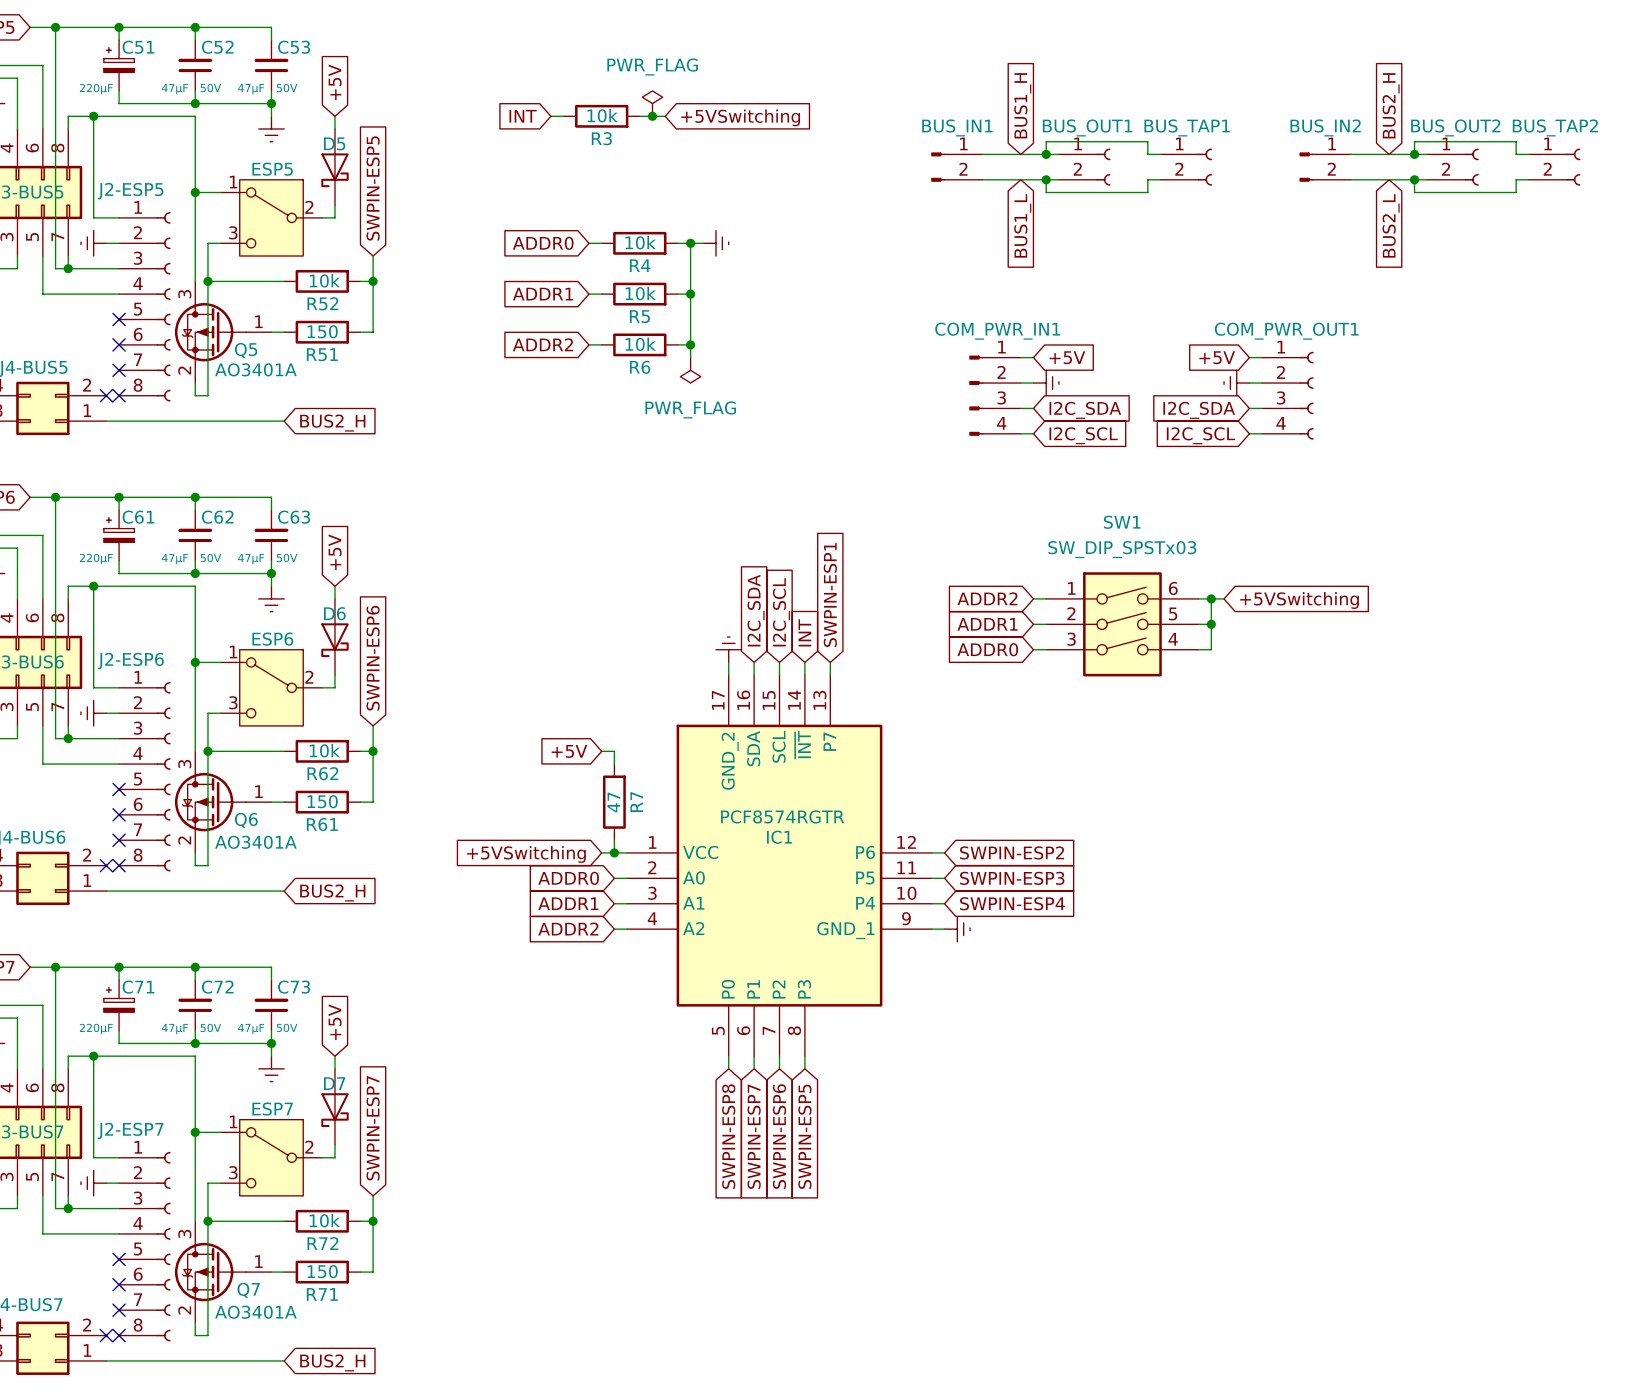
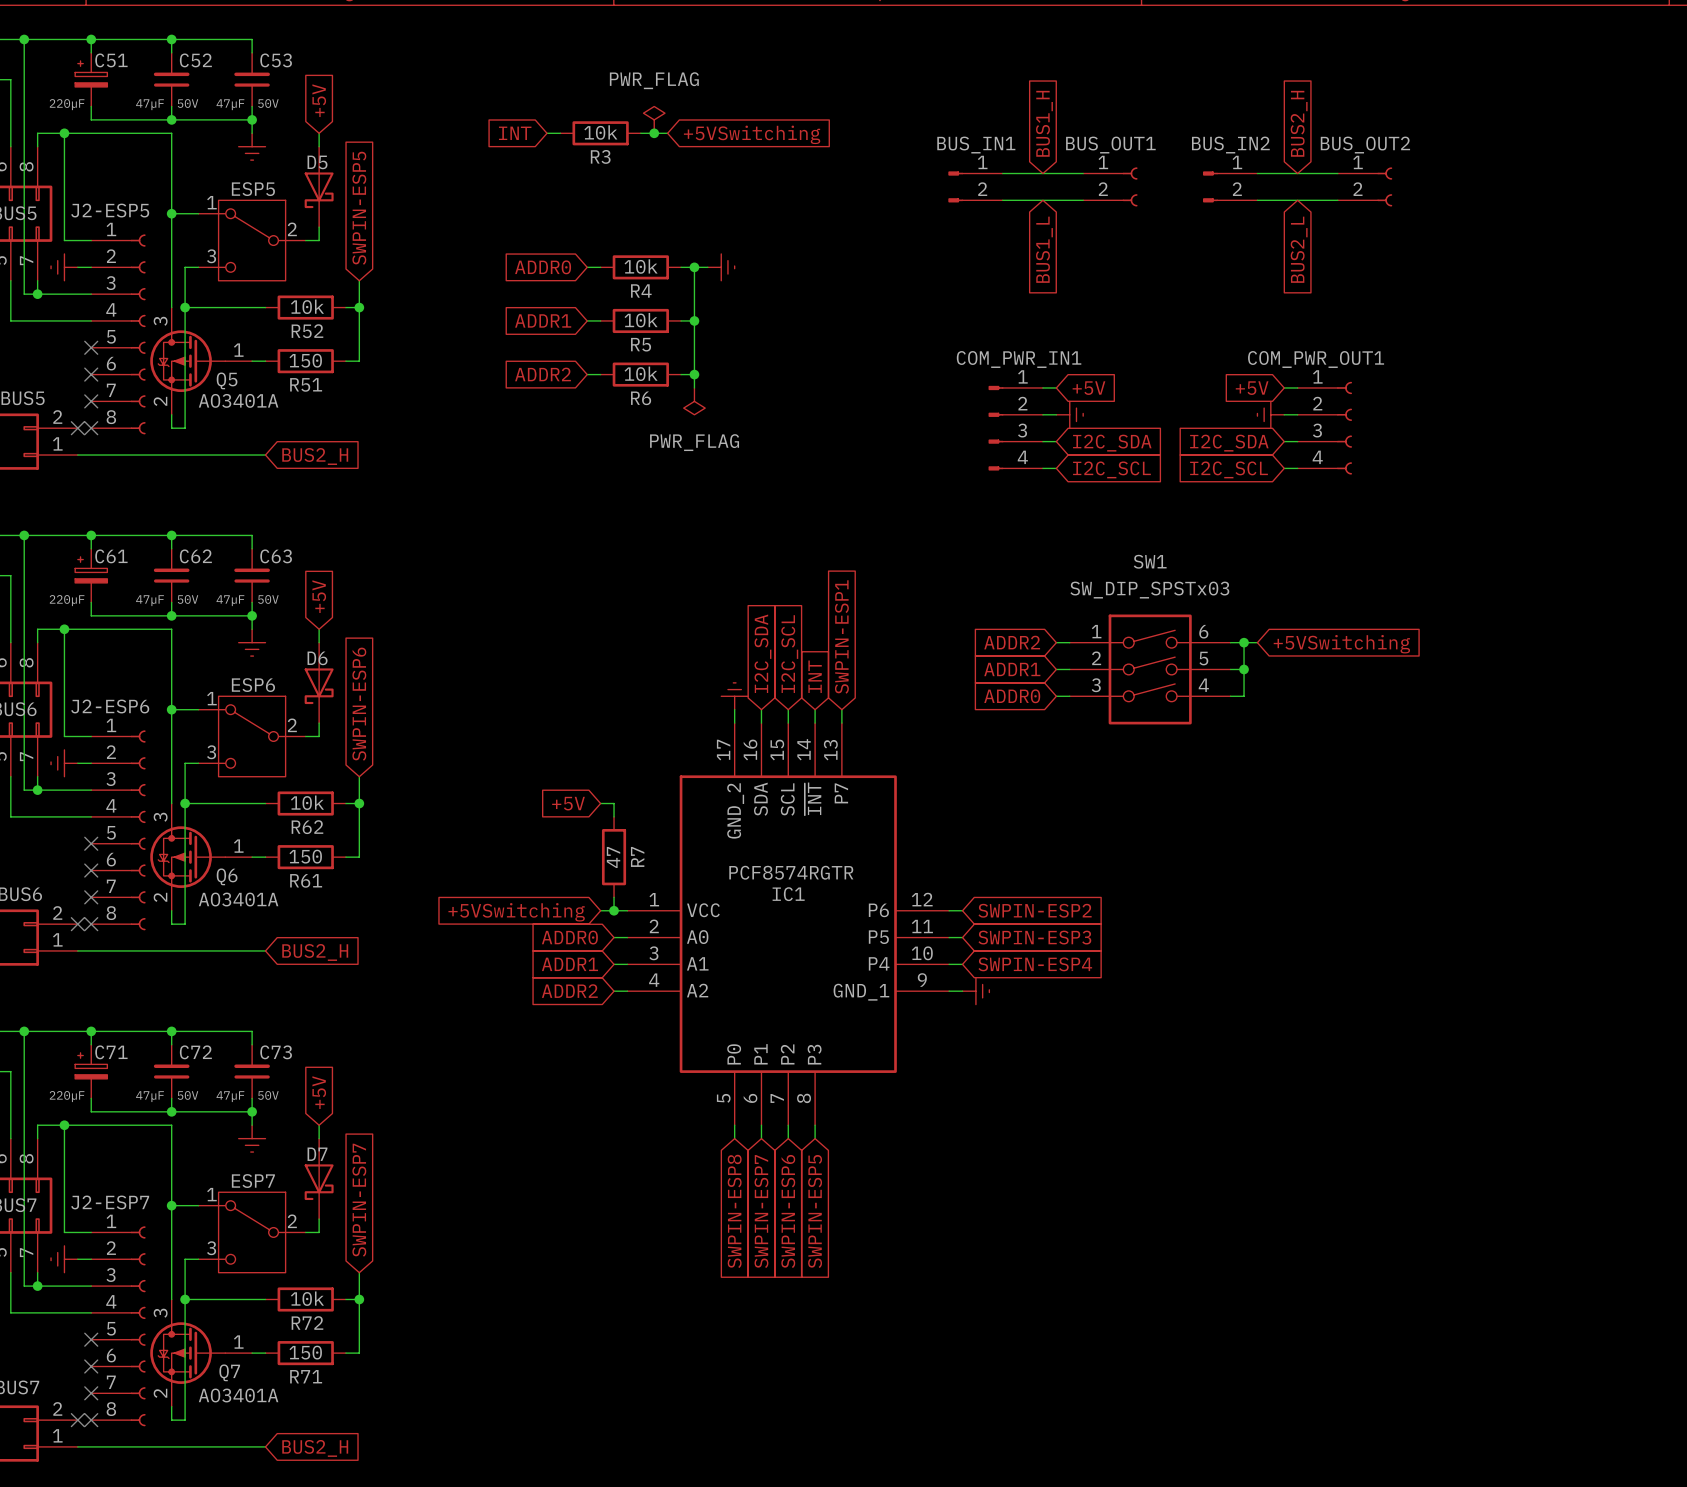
global label position: BUS2_H (1391, 105) -> BUS2_H (1299, 123)
wire: (1046, 154) (1046, 141) (1147, 141) (1147, 154) (1160, 154) -> none
junction: (1046, 154) -> none
wire: (1351, 154) (1427, 154) -> (1257, 173) (1337, 173)
wire: (1414, 154) (1414, 141) (1516, 141) (1516, 154) (1528, 154) -> none
junction: (1414, 154) -> none
BUS_TAP1: (1186, 167) -> none
BUS_IN2 position: (1325, 167) -> (1230, 186)
BUS_OUT2 position: (1453, 167) -> (1365, 186)
BUS_TAP2: (1554, 167) -> none
wire: (1046, 179) (1046, 192) (1147, 192) (1147, 179) (1160, 179) -> none
junction: (1046, 179) -> none
wire: (1351, 179) (1427, 179) -> (1257, 200) (1337, 200)
wire: (1414, 179) (1414, 192) (1516, 192) (1516, 179) (1528, 179) -> none
junction: (1414, 179) -> none
global label position: BUS2_L (1391, 225) -> BUS2_L (1299, 249)

